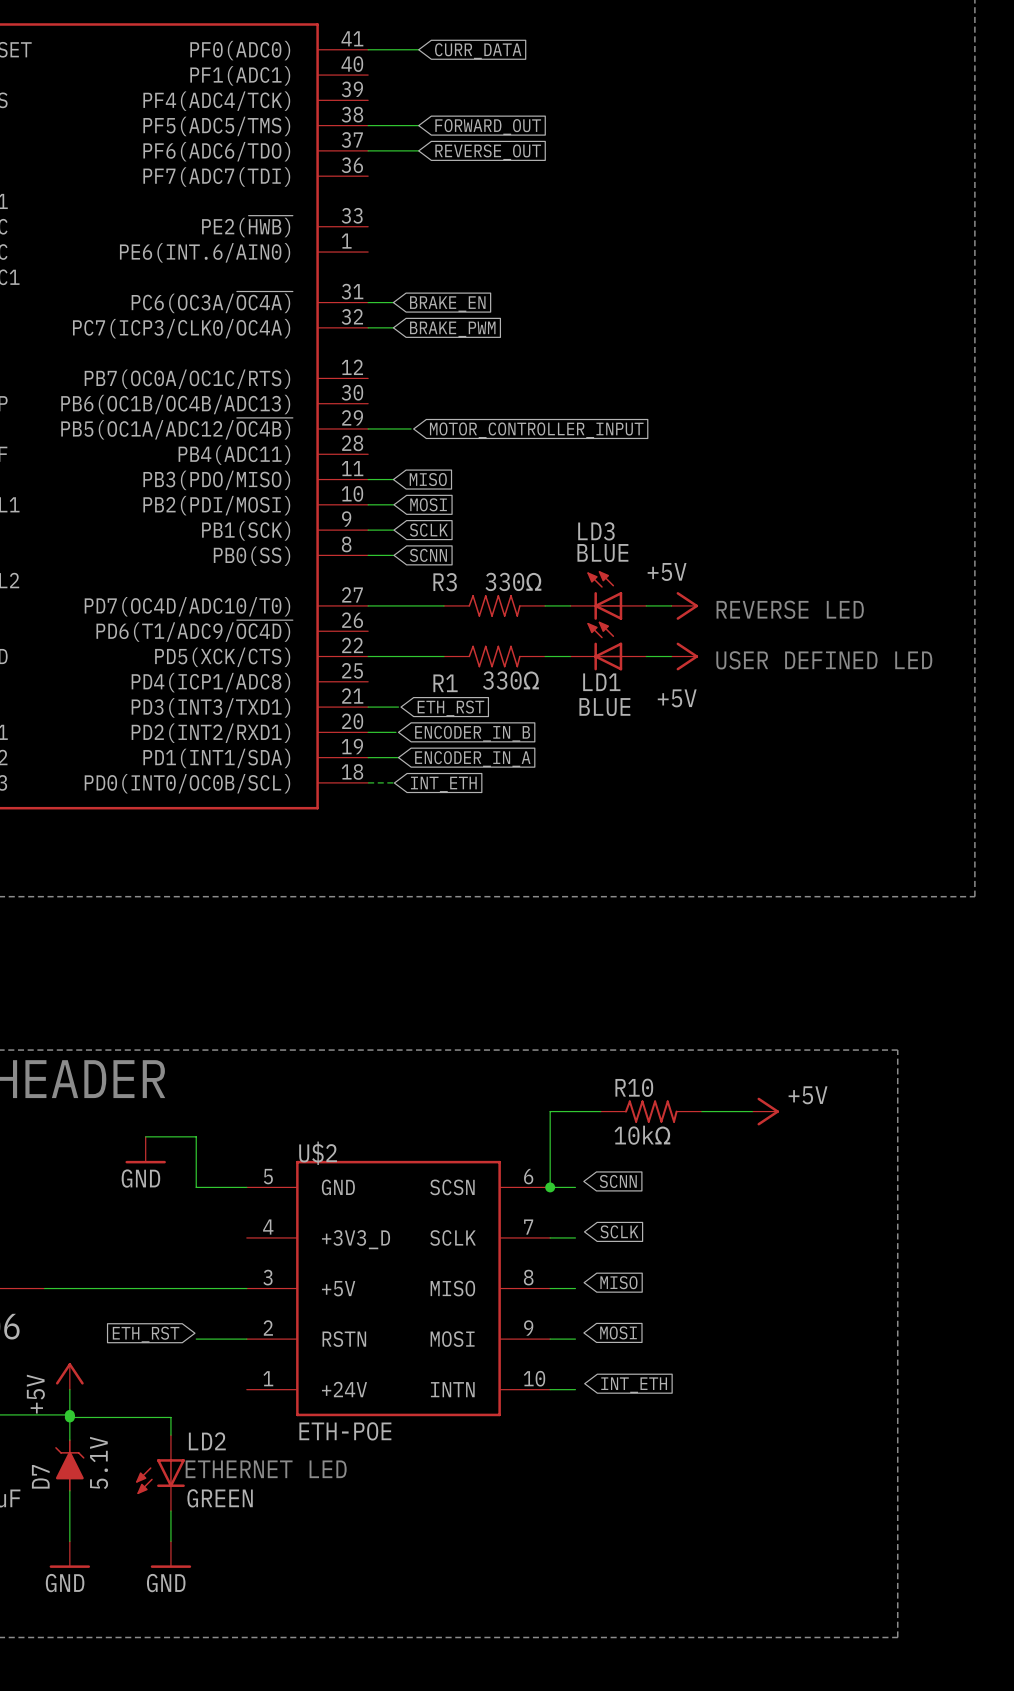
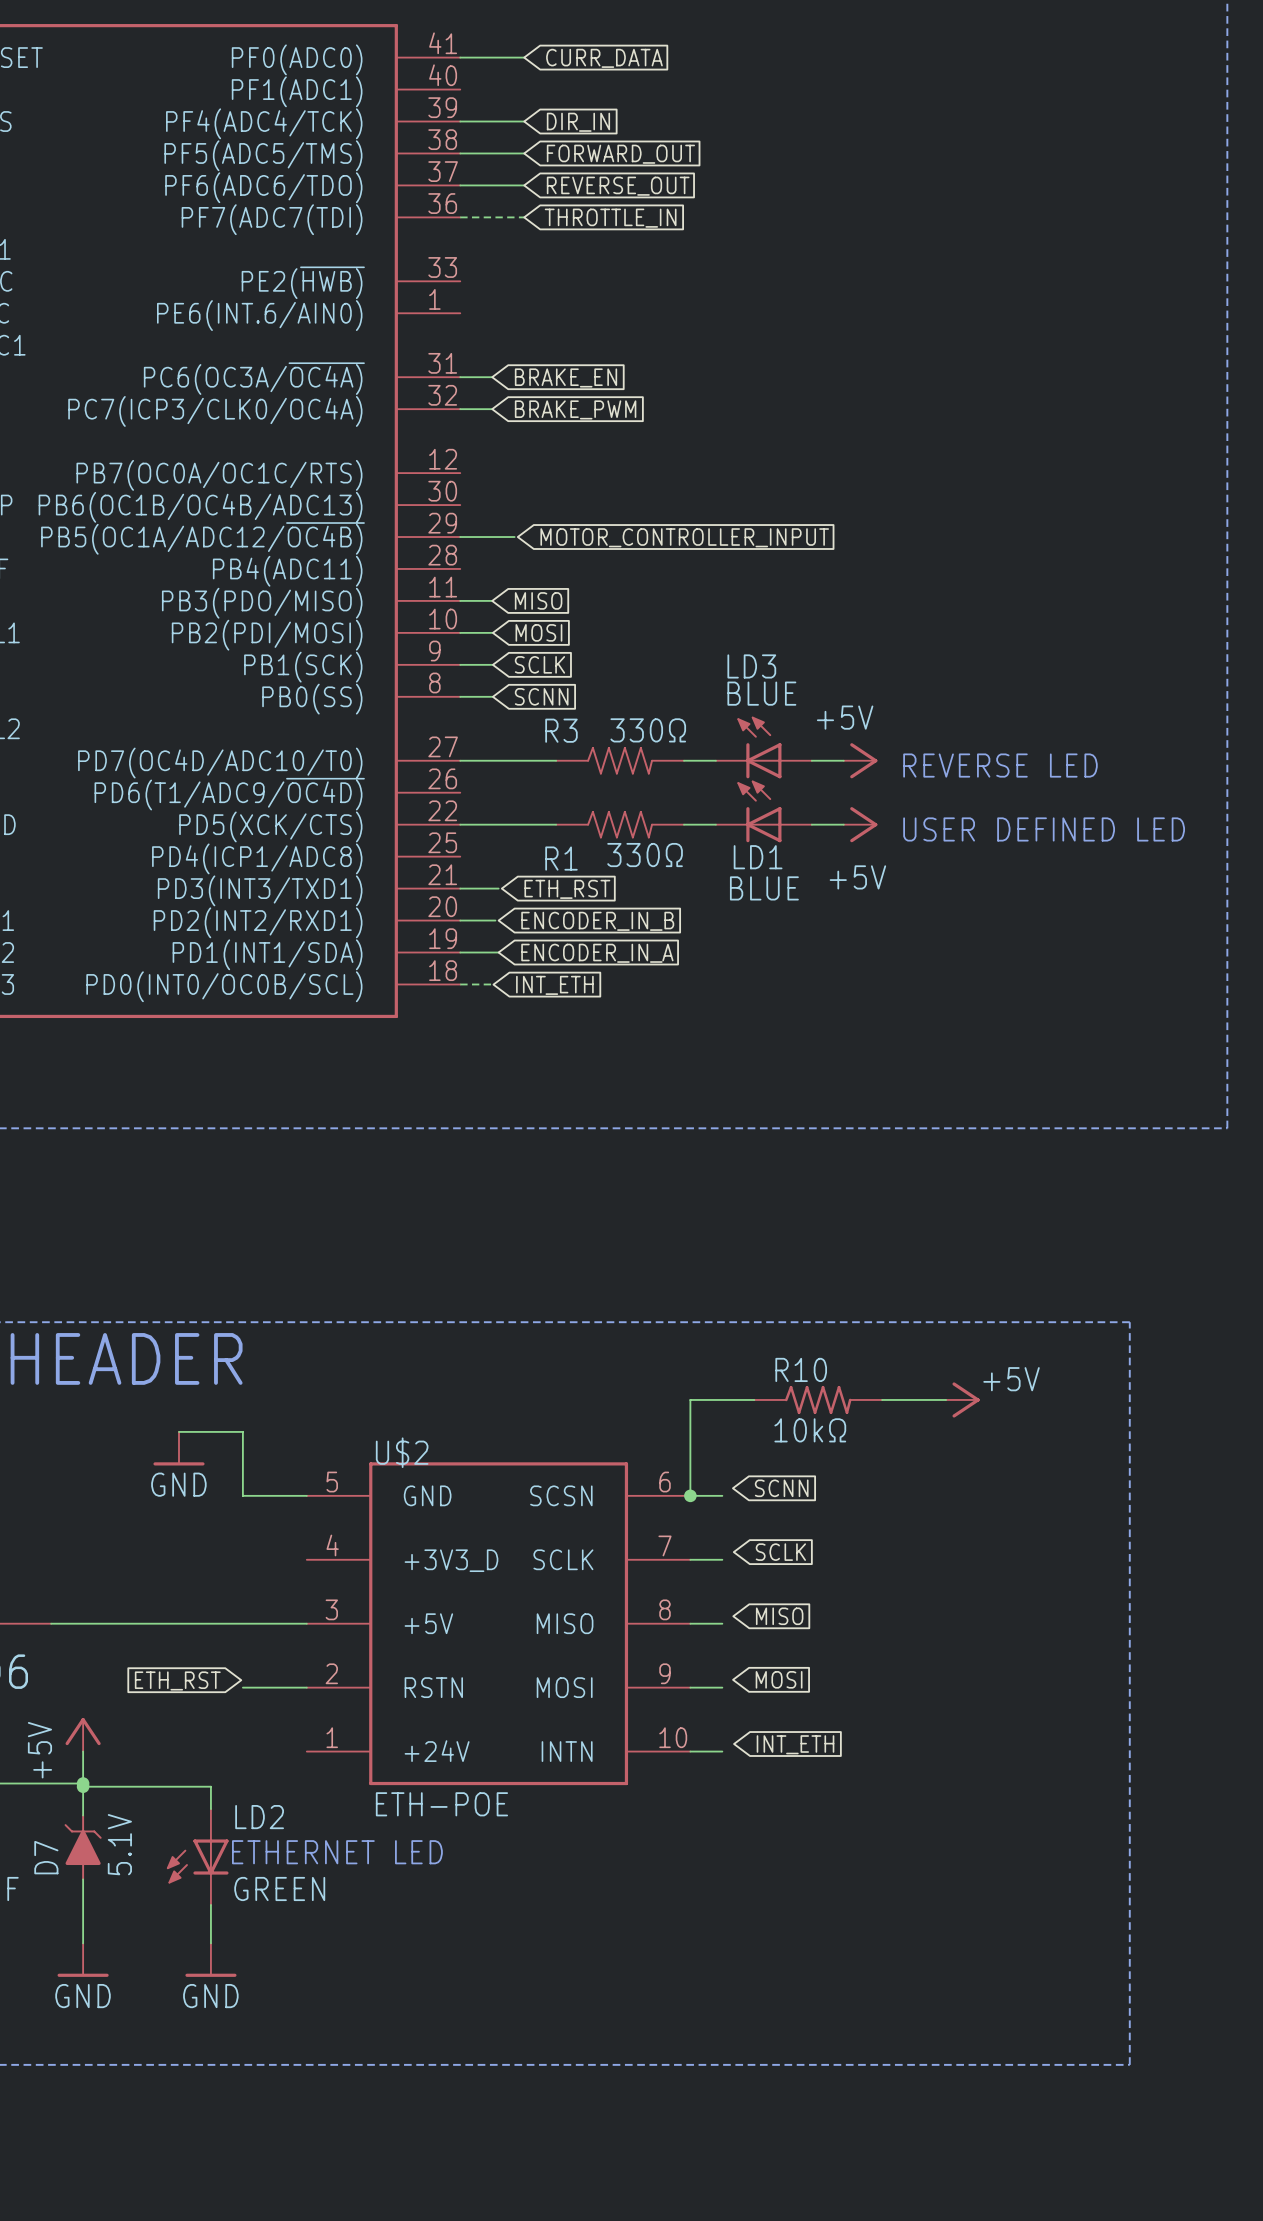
wire: none -> (460, 121) (524, 121)
global label: none -> DIR_IN (578, 122)
wire: none -> (460, 217) (524, 217)
global label: none -> THROTTLE_IN (610, 218)

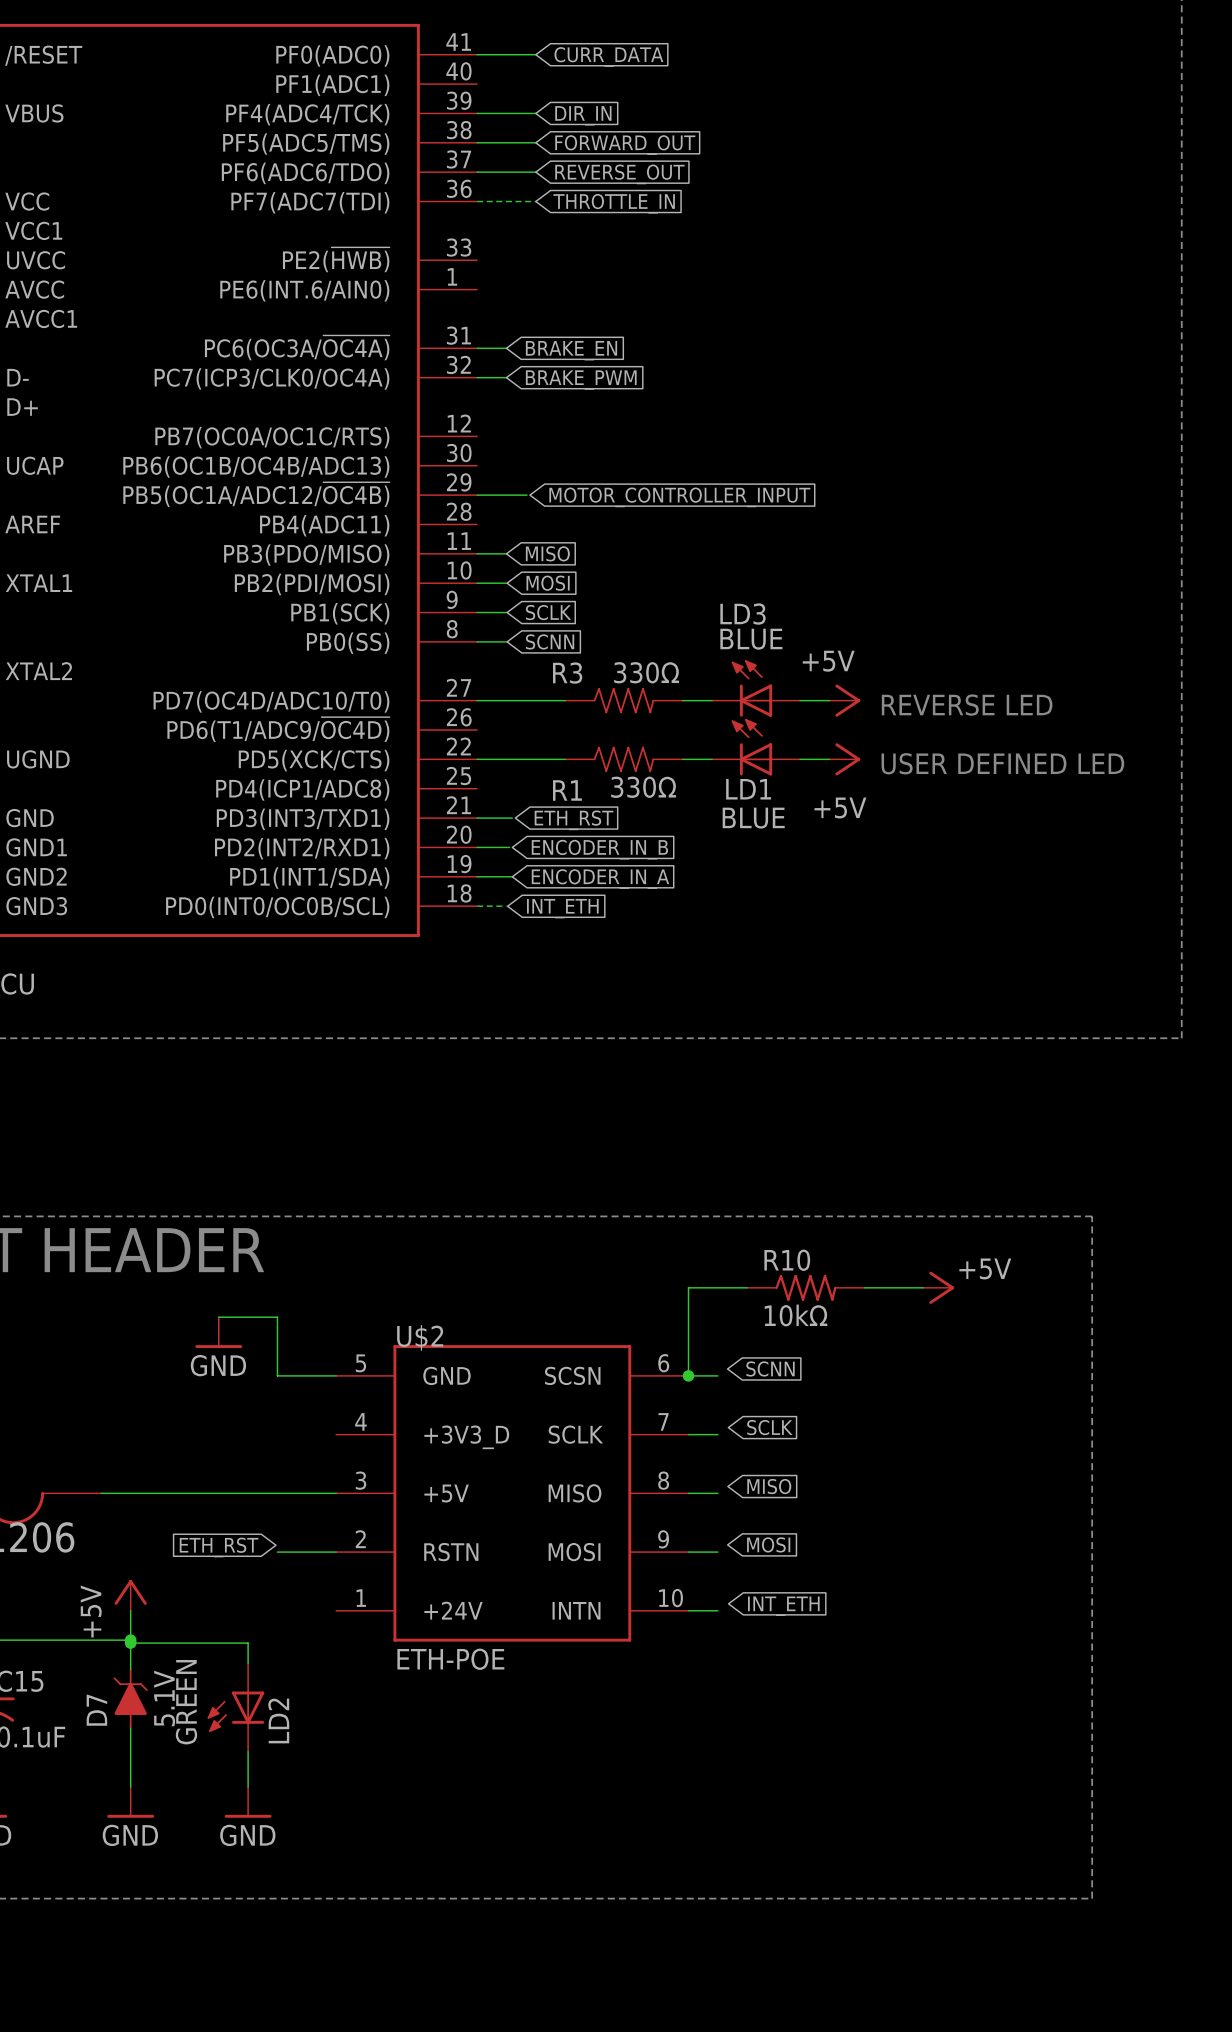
LD2 name rotation: 0° (259, 1817) -> 90° counterclockwise (278, 1720)
text: ETHERNET LED (337, 1852) -> none
LD2 value rotation: 0° (279, 1888) -> 90° counterclockwise (186, 1702)
LD2 value position: GREEN (279, 1888) -> GREEN (186, 1702)

